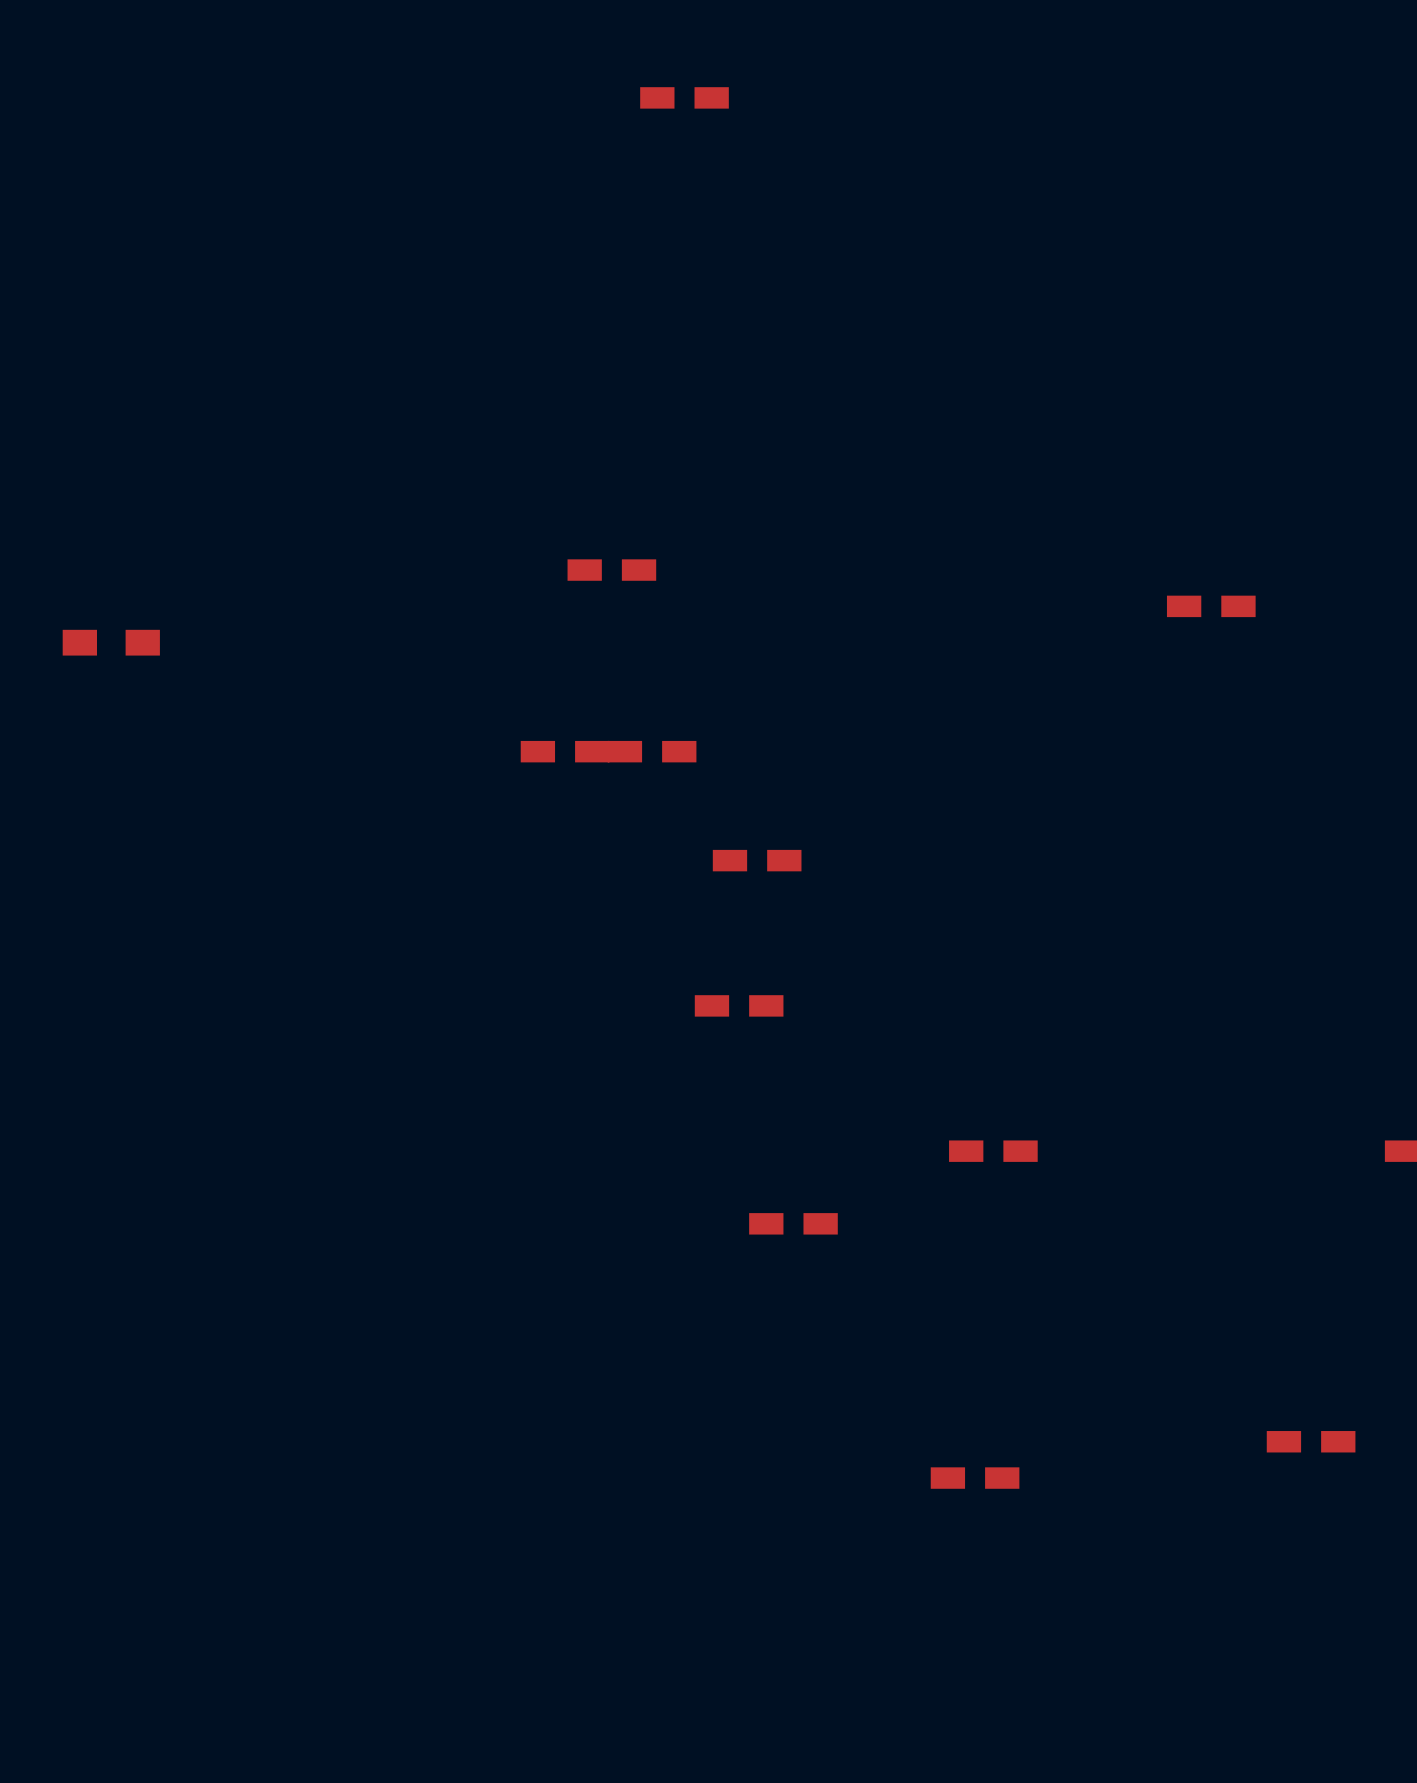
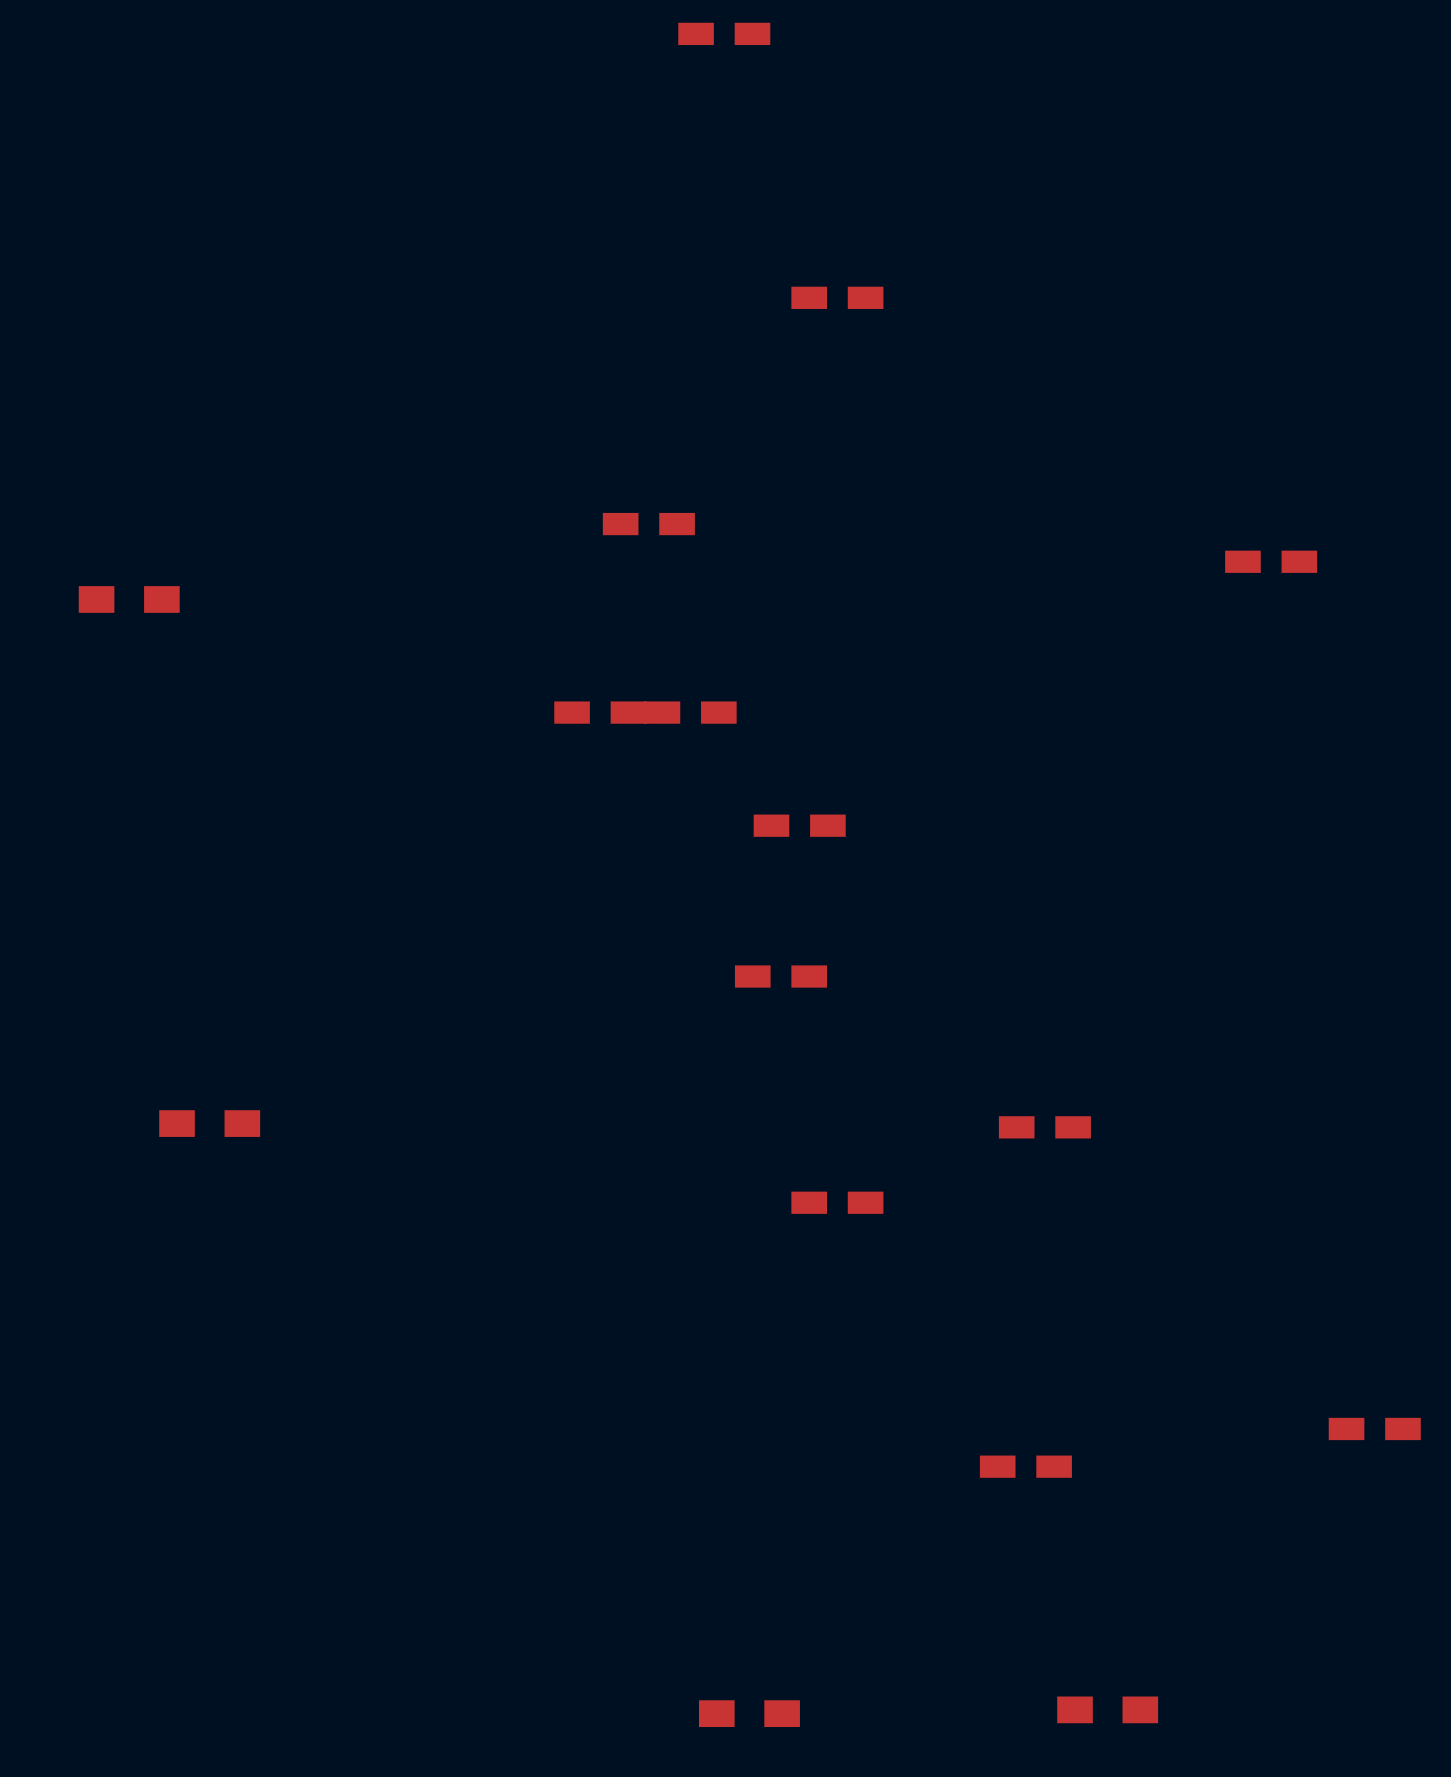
part: none -> (837, 297)
part: none -> (209, 1123)
part: none -> (1107, 1709)
part: none -> (749, 1713)

